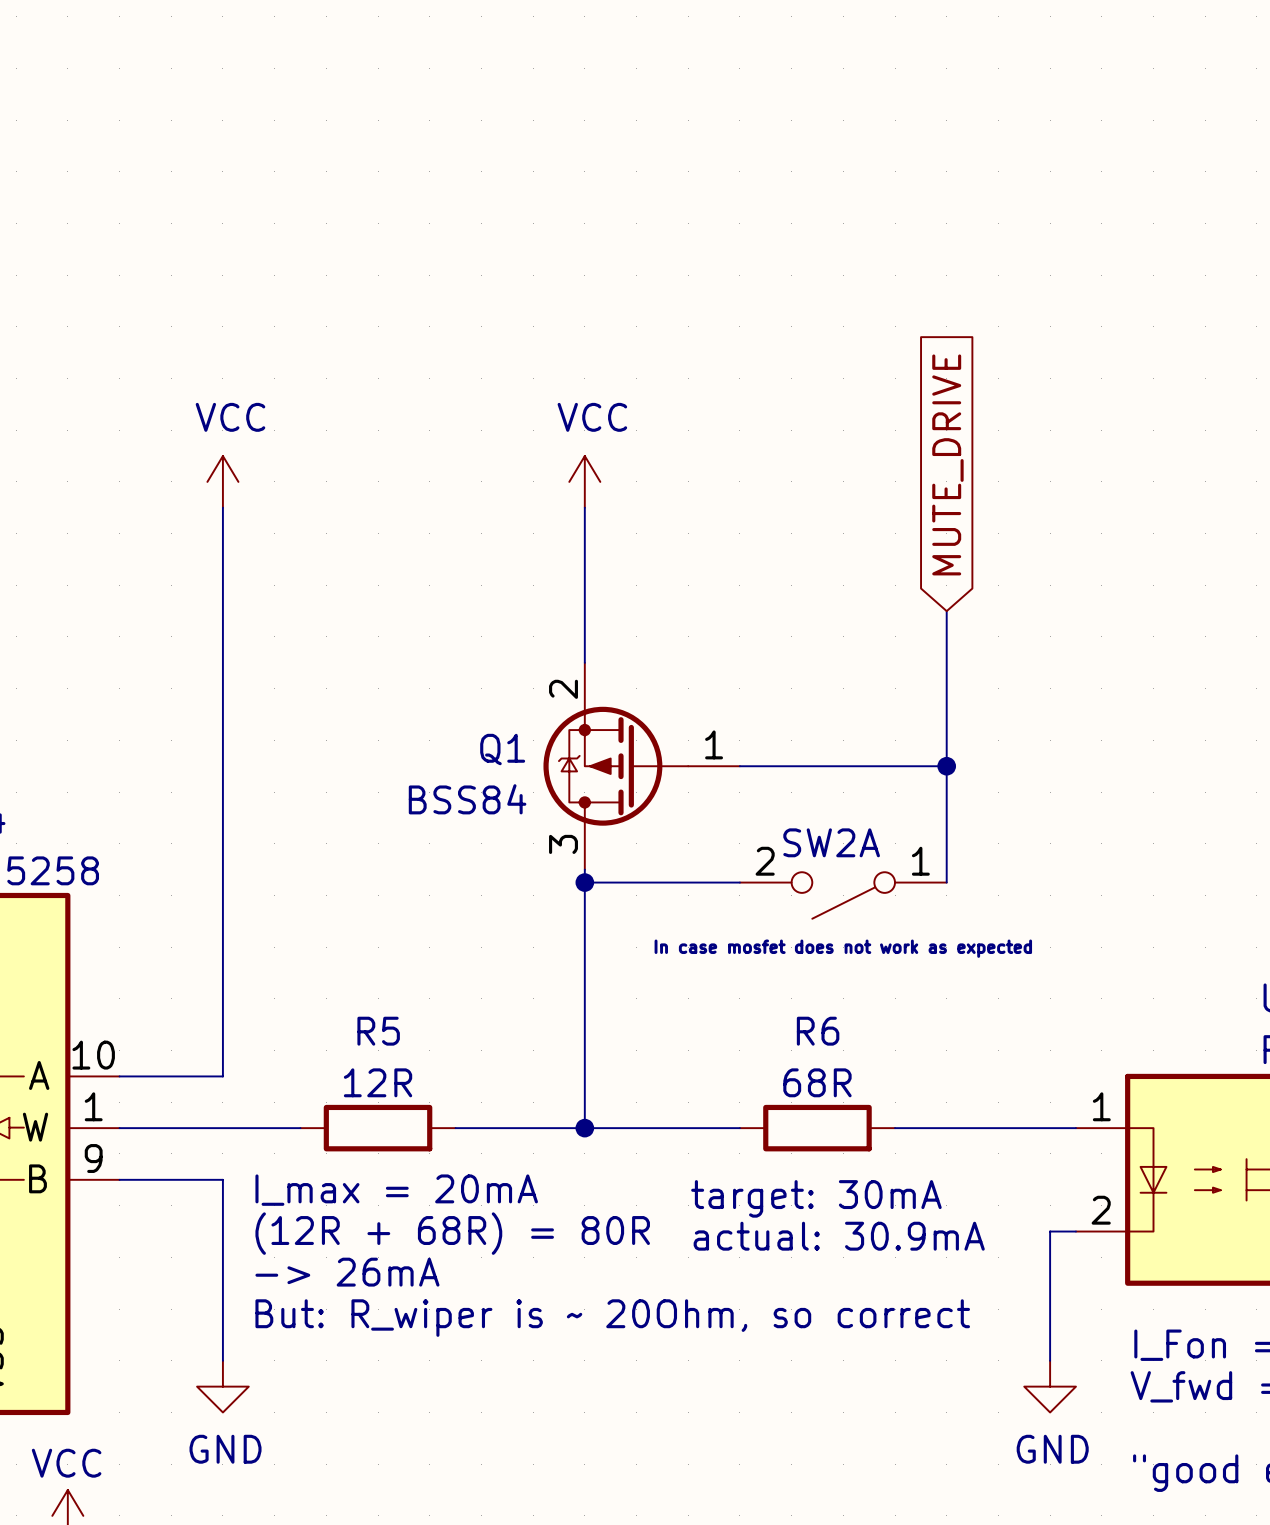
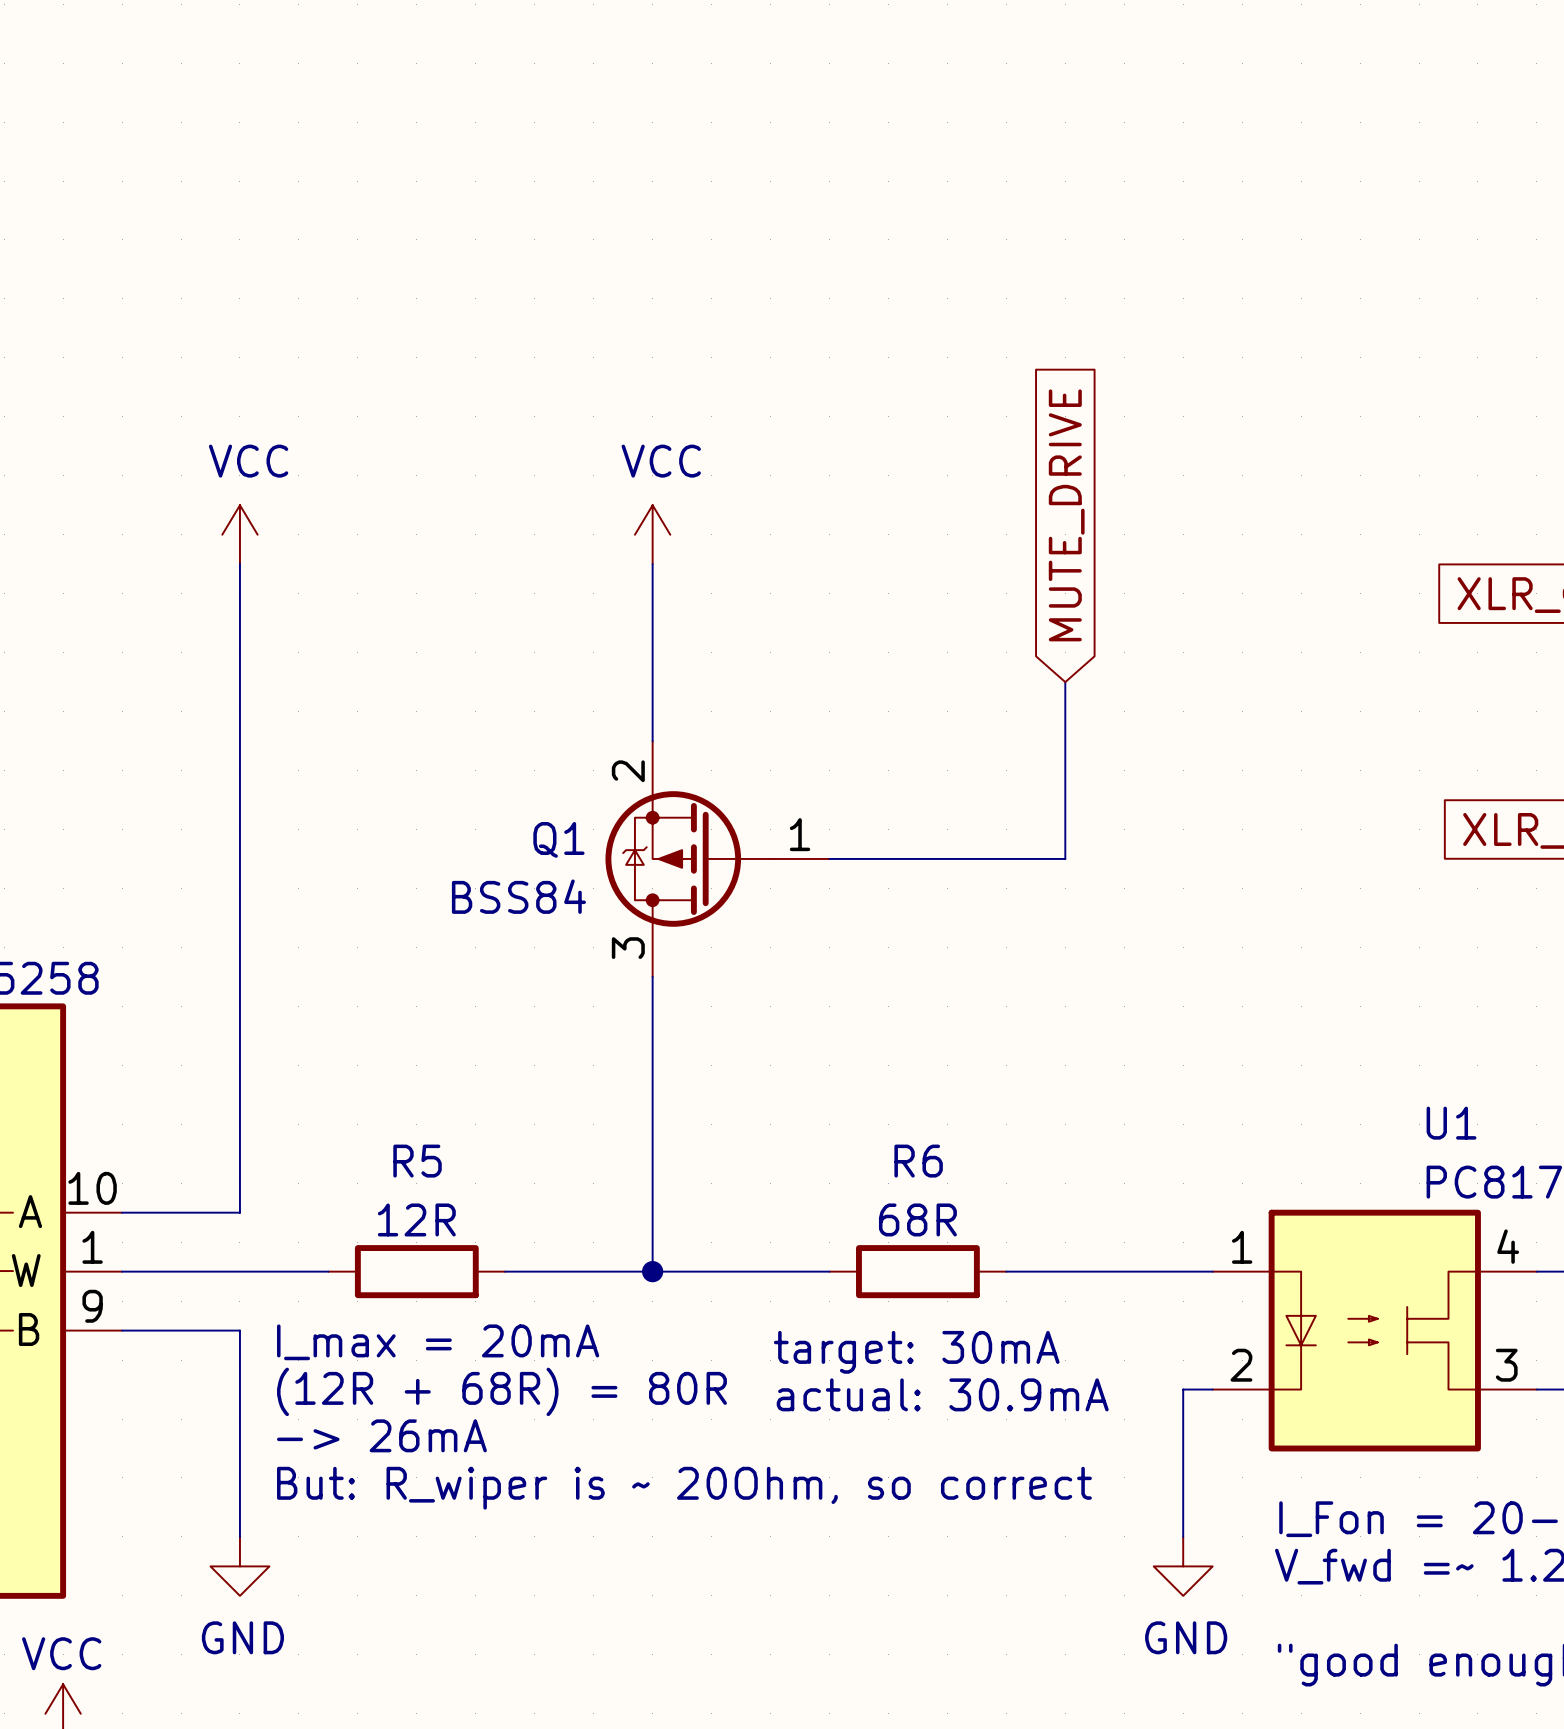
wire: (946, 766) (946, 882) -> none
junction: (946, 766) -> none
wire: (584, 882) (739, 882) -> none
junction: (584, 882) -> none
SW2A: In case mosfet does not work as expected (843, 895) -> none

